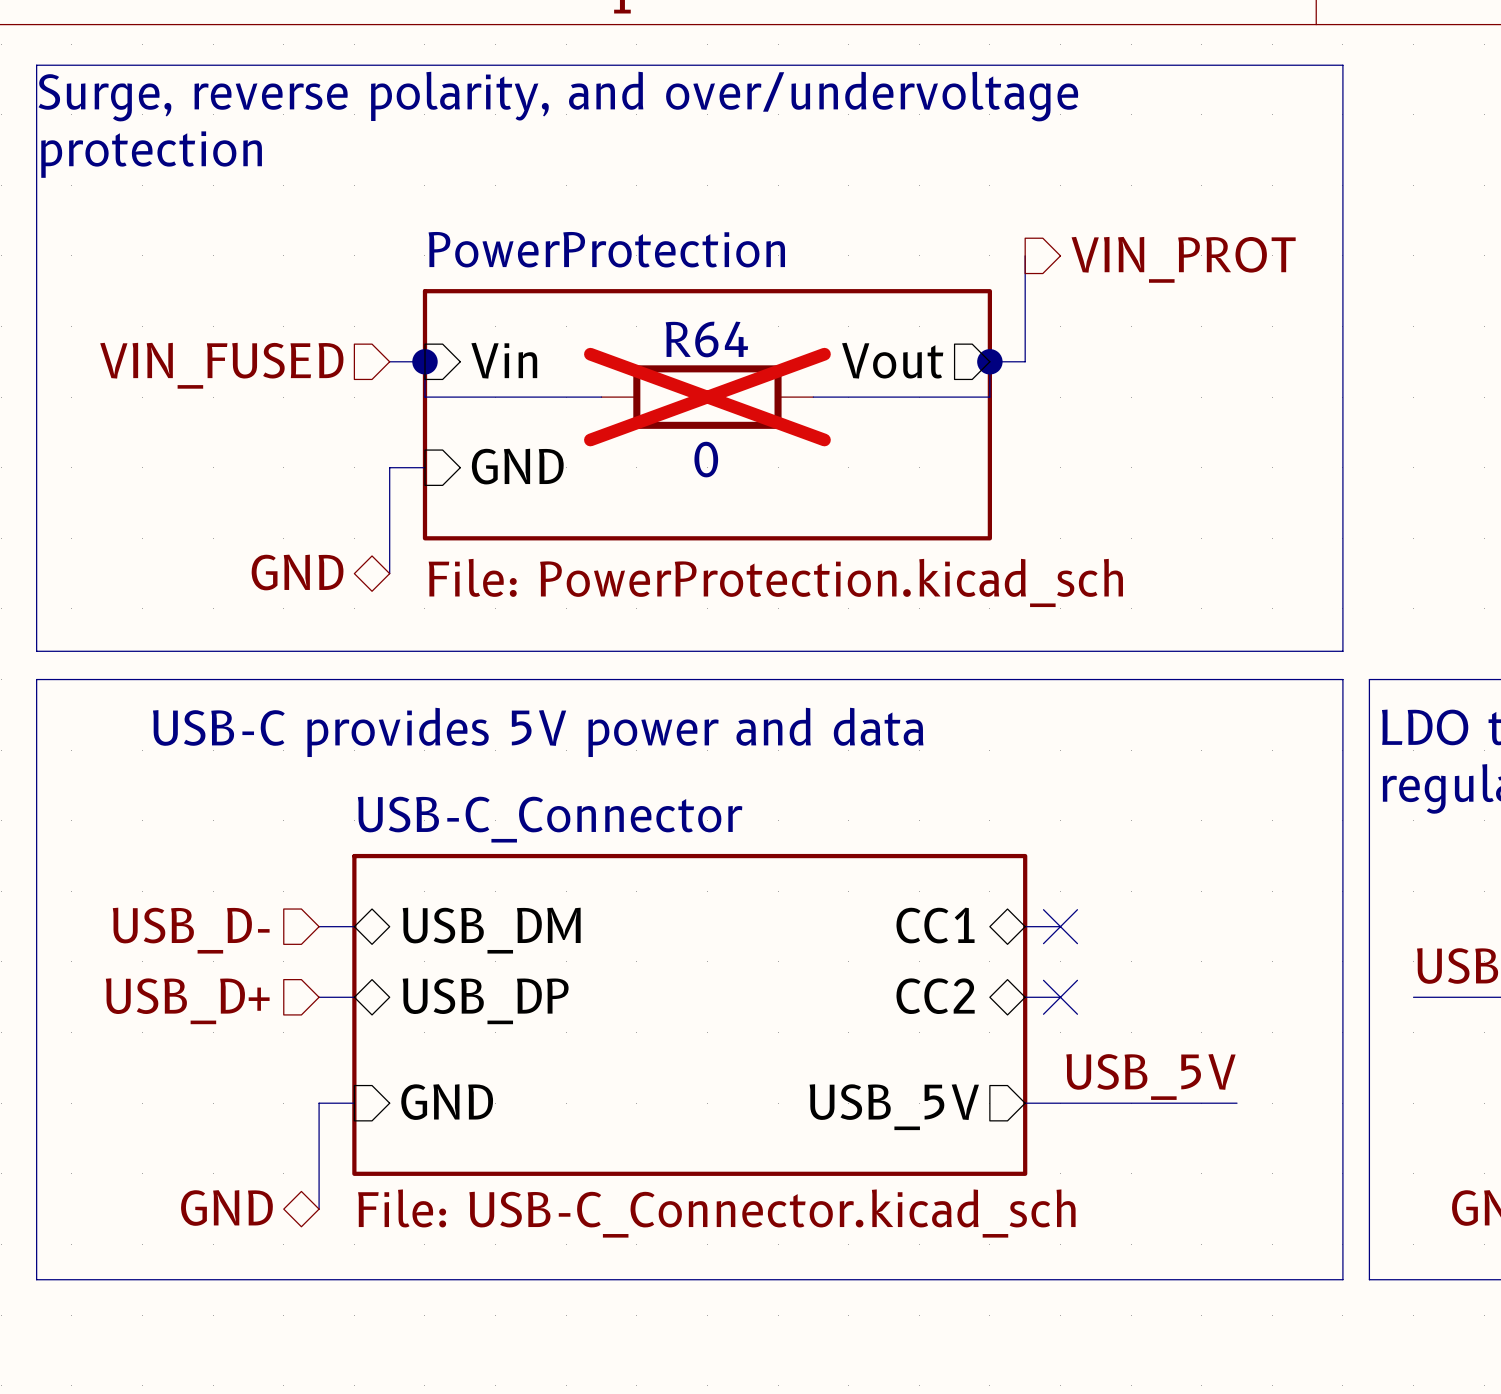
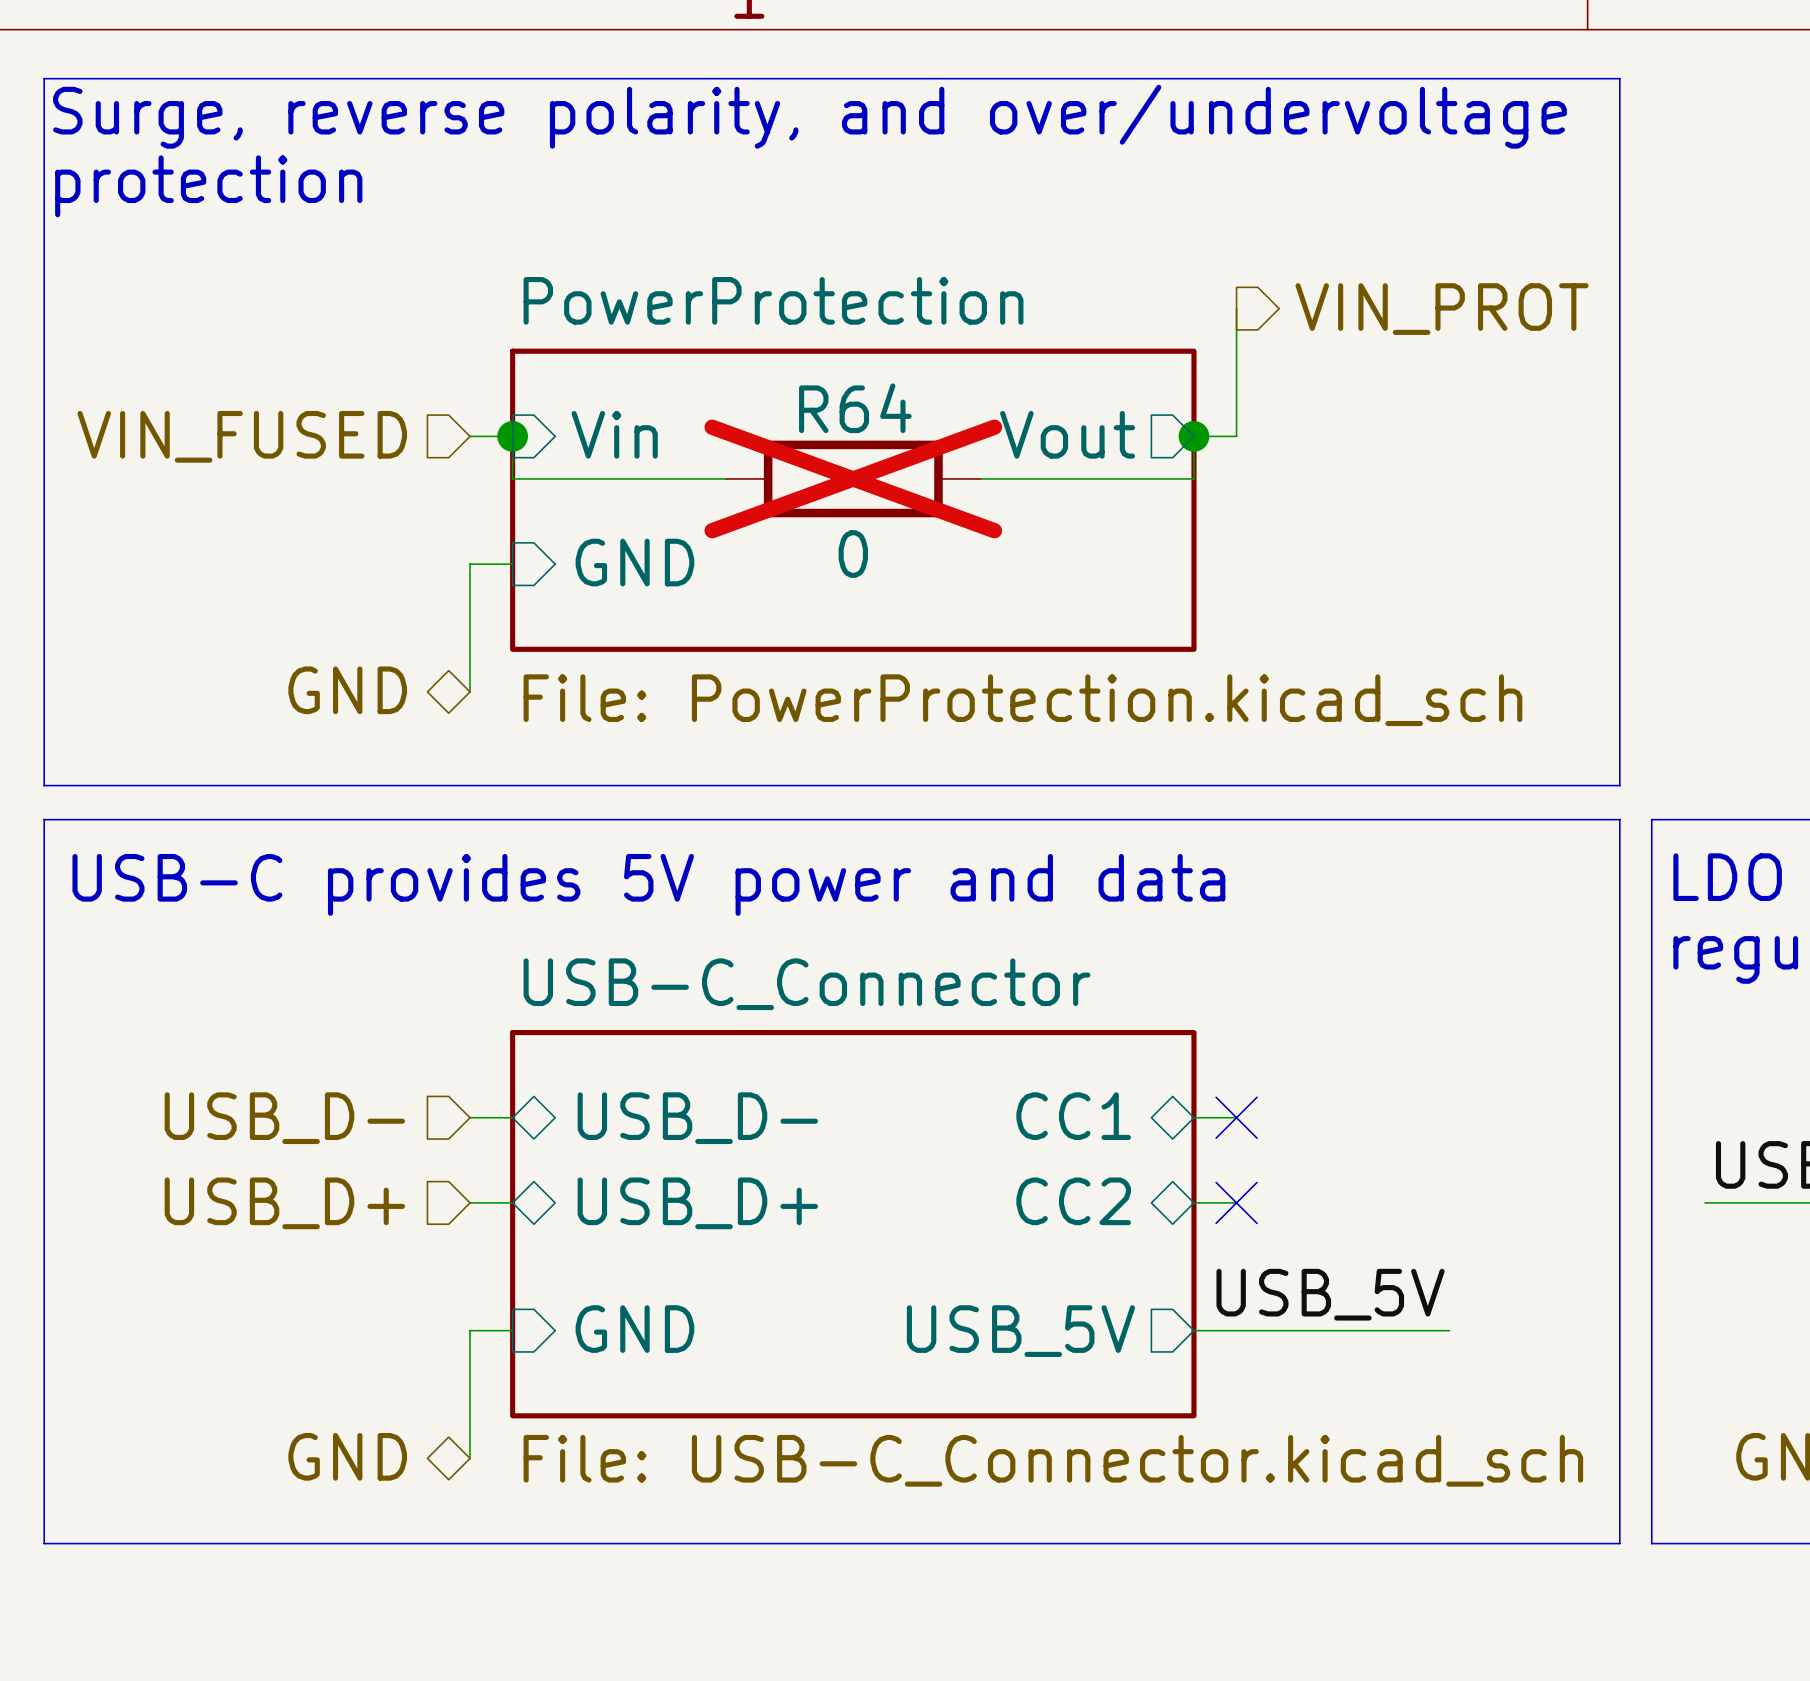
sheet USB-C_Connector shape: [352, 853, 1028, 1176] -> [510, 1030, 1197, 1419]
sheet pin position: CC1 (935, 925) -> CC1 (1073, 1116)
wire: (319, 926) (354, 926) -> (470, 1117) (512, 1117)
wire: (1025, 926) (1060, 926) -> (1236, 1117) (1193, 1117)
no-connect mark position: (1060, 926) -> (1236, 1117)
hierarchical label position: USB_D- (191, 930) -> USB_D- (284, 1118)
sheet pin: USB_DM (491, 930) -> none
sheet pin: none -> USB_D- (697, 1118)
sheet pin position: CC2 (935, 996) -> CC2 (1073, 1201)
wire: (319, 997) (354, 997) -> (470, 1202) (512, 1202)
wire: (1025, 997) (1060, 997) -> (1236, 1202) (1193, 1202)
no-connect mark position: (1060, 997) -> (1236, 1202)
hierarchical label position: USB_D+ (187, 1001) -> USB_D+ (284, 1203)
sheet pin: USB_DP (485, 1001) -> none
sheet pin: none -> USB_D+ (697, 1203)
label position: USB_5V (1150, 1076) -> USB_5V (1330, 1294)
sheet pin position: GND (447, 1102) -> GND (634, 1329)
wire: (354, 1103) (319, 1103) (319, 1209) -> (512, 1330) (470, 1330) (470, 1458)
wire: (1201, 1103) (1237, 1103) -> (1193, 1330) (1236, 1330)
sheet pin position: USB_5V (894, 1107) -> USB_5V (1020, 1331)
hierarchical label position: GND (226, 1207) -> GND (347, 1456)

